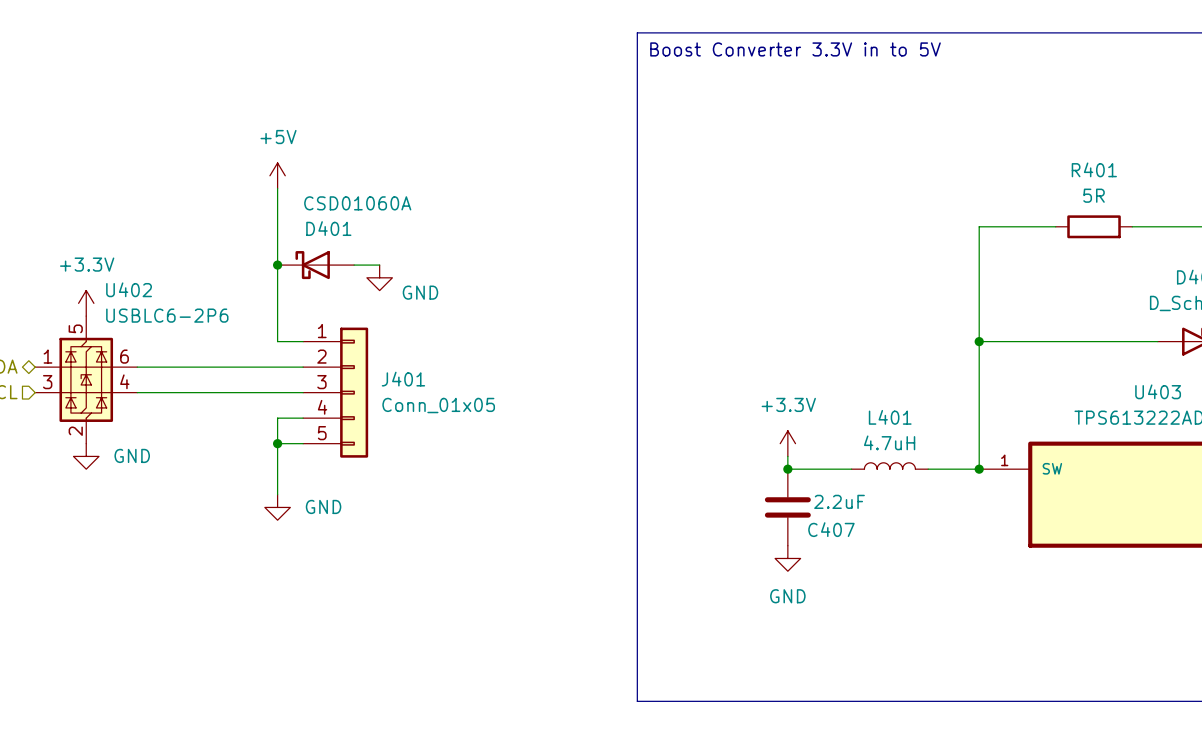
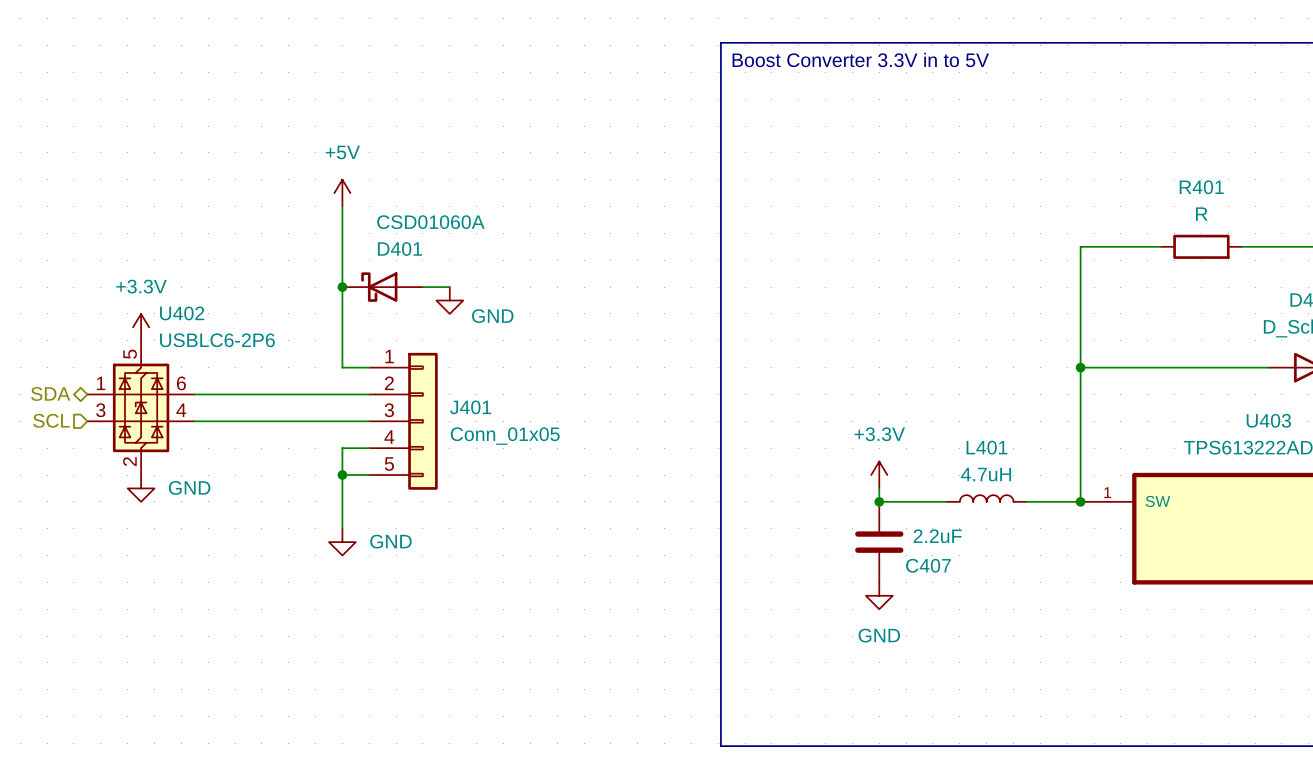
R401 value: 5R (1094, 195) -> R (1201, 214)

